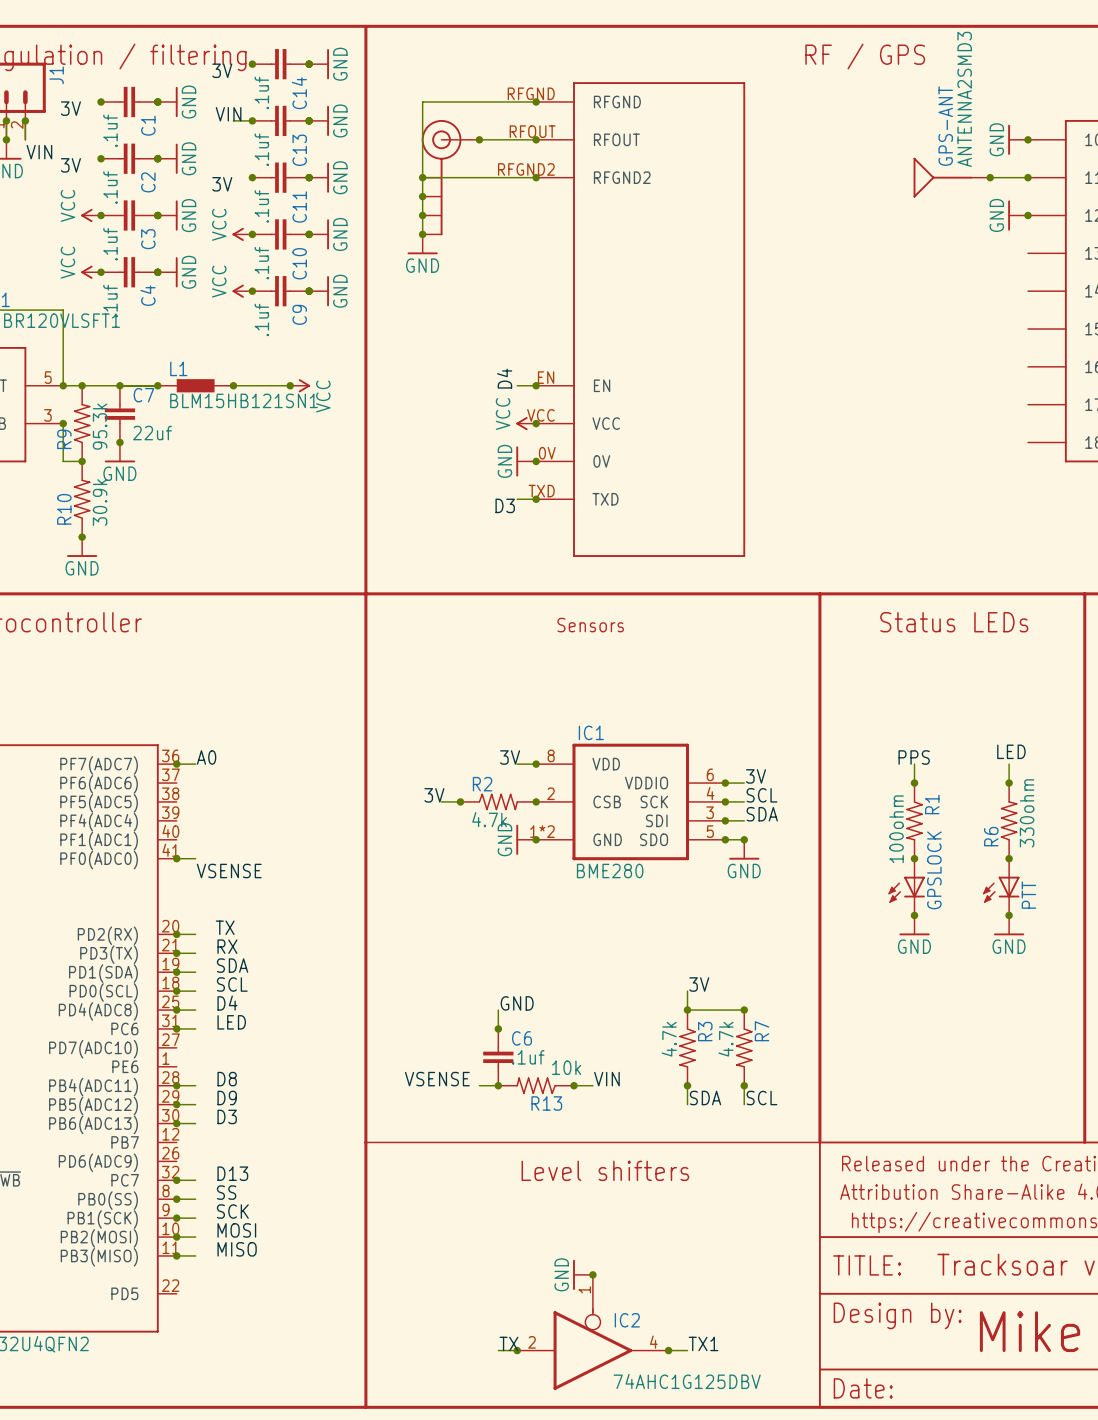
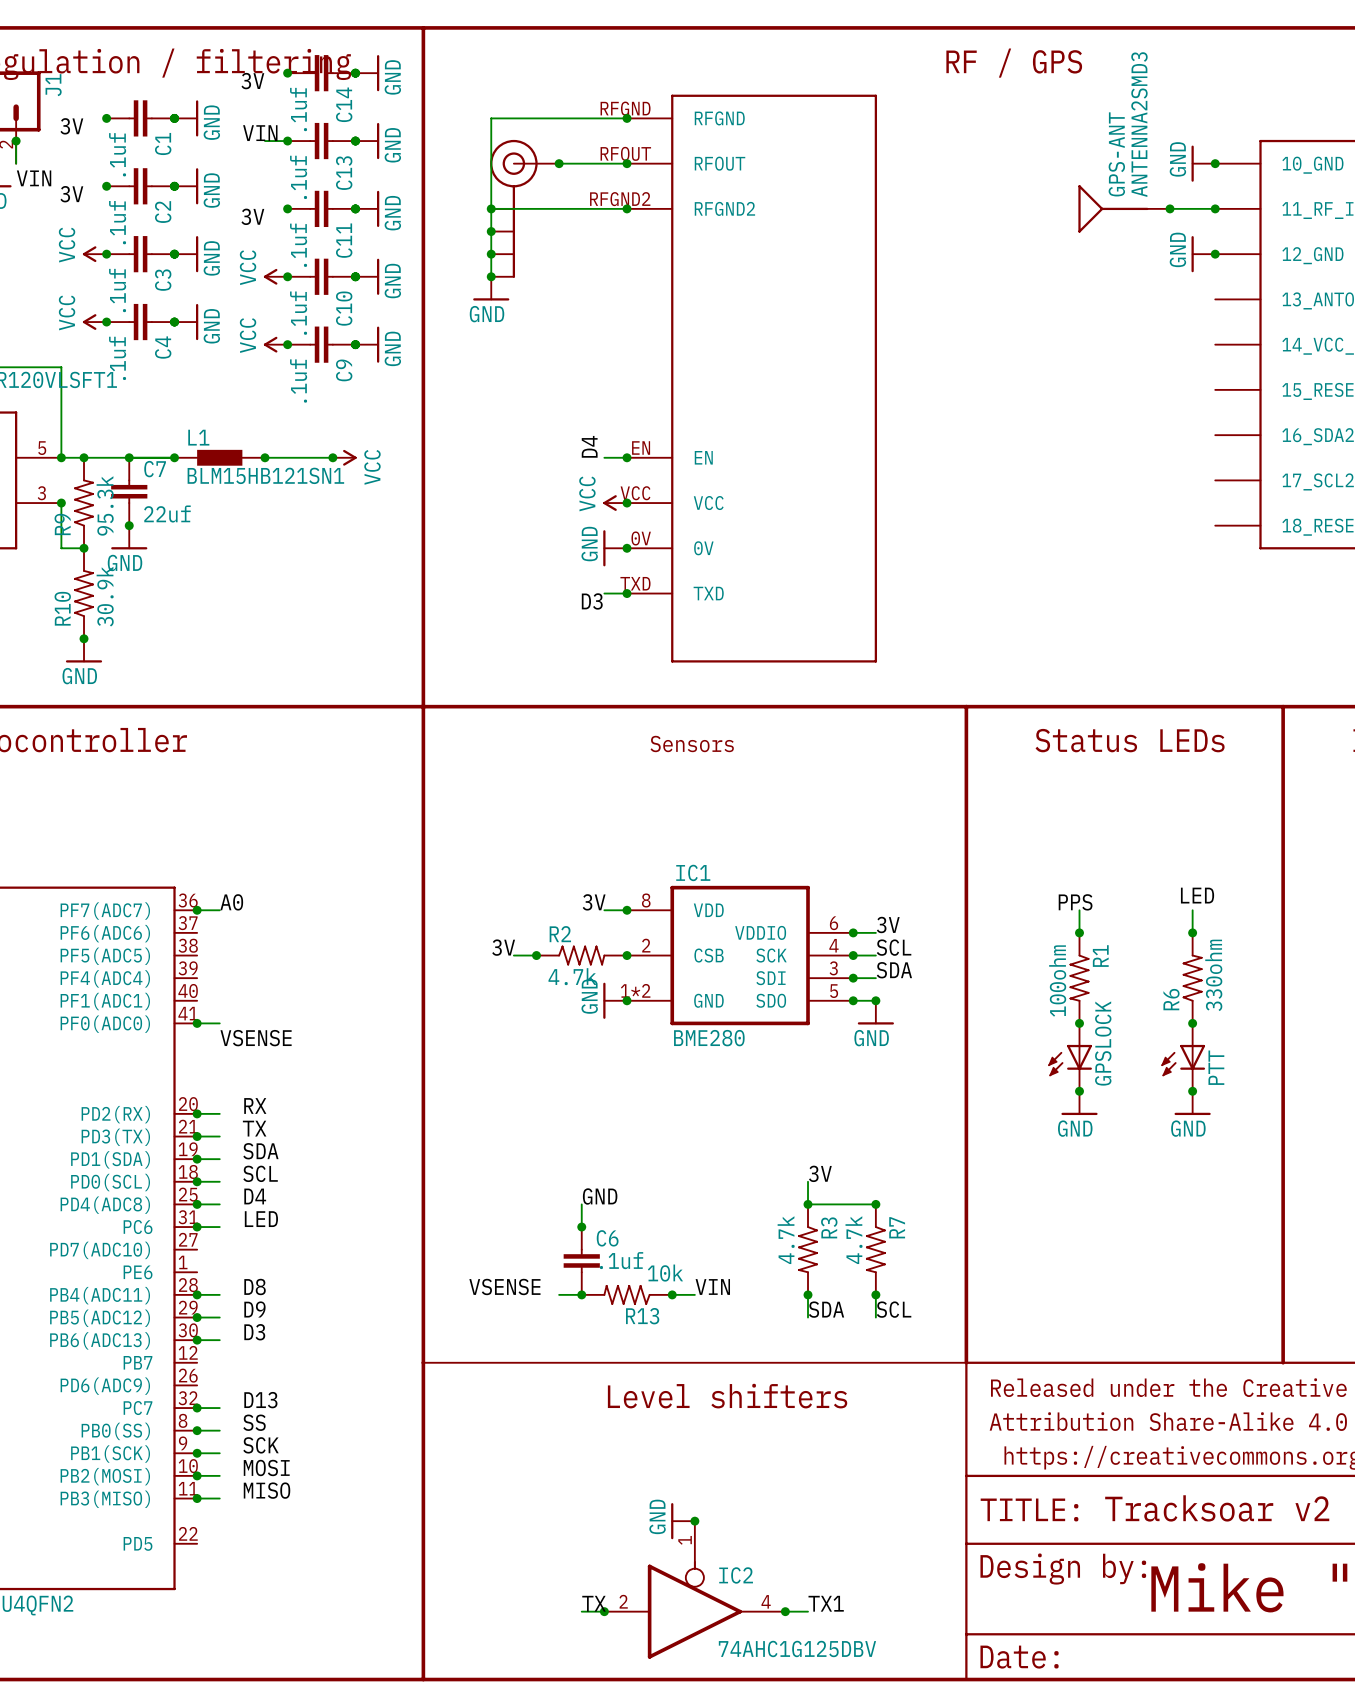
label: TX (225, 927) -> RX (255, 1105)
label: RX (227, 946) -> TX (254, 1128)

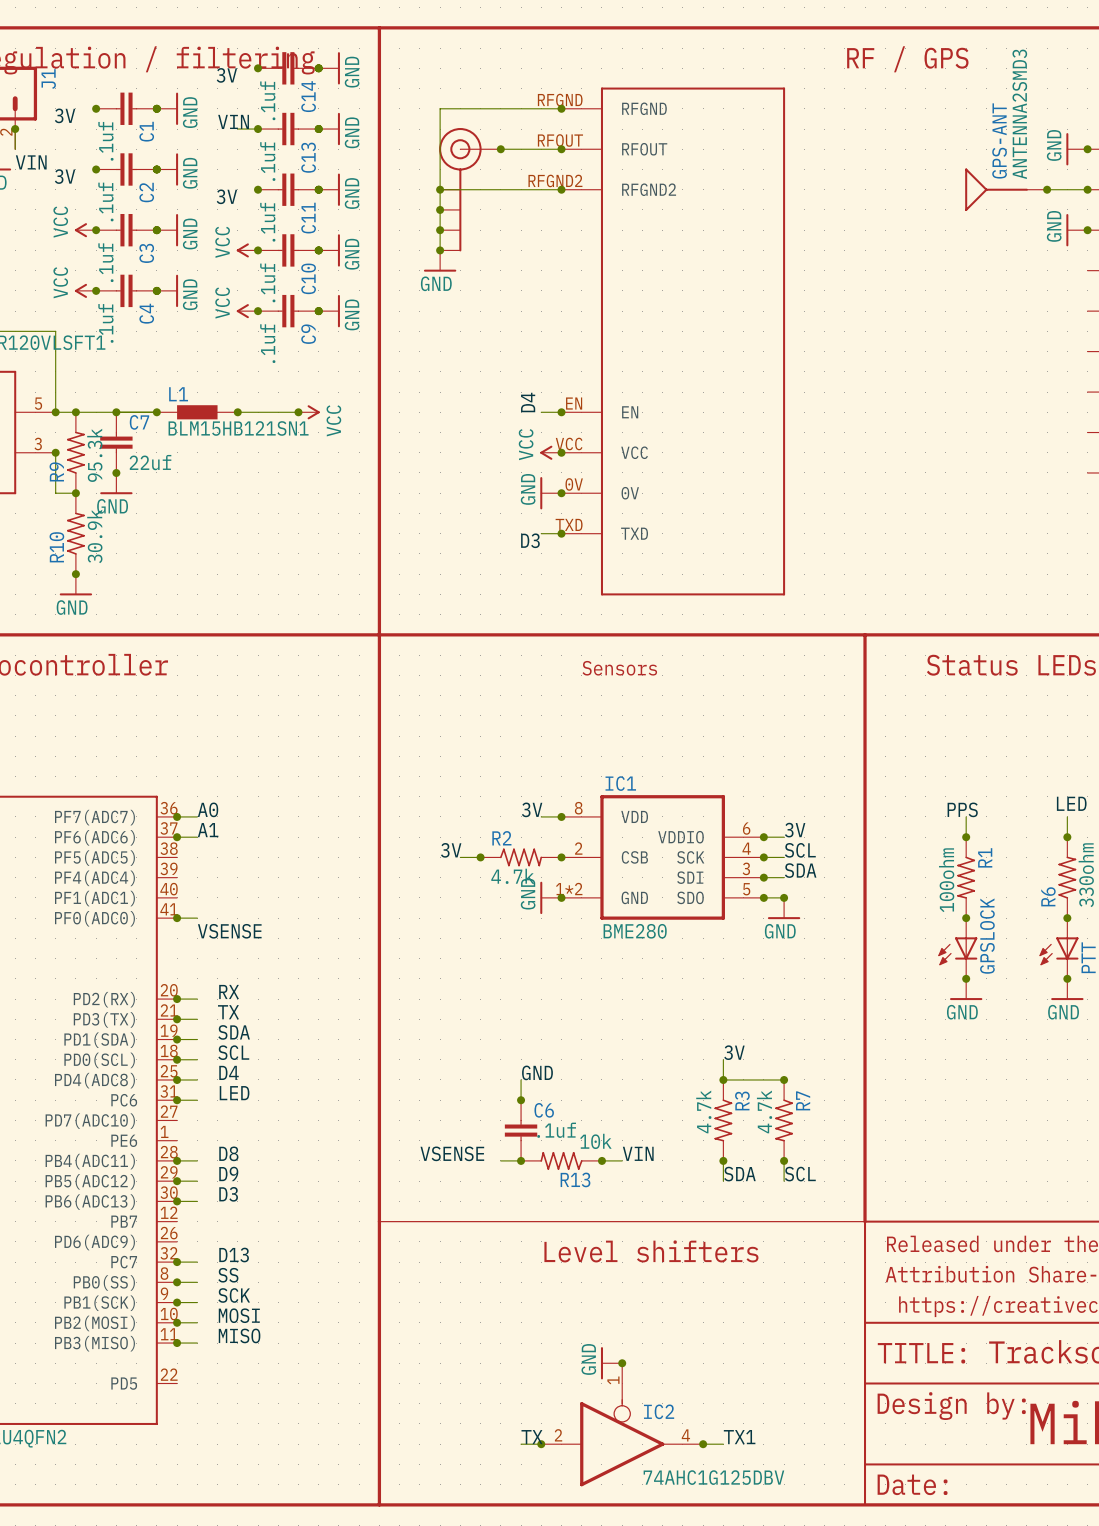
label: none -> A1 (208, 830)
wire: none -> (177, 837) (197, 837)
junction: none -> (177, 837)

